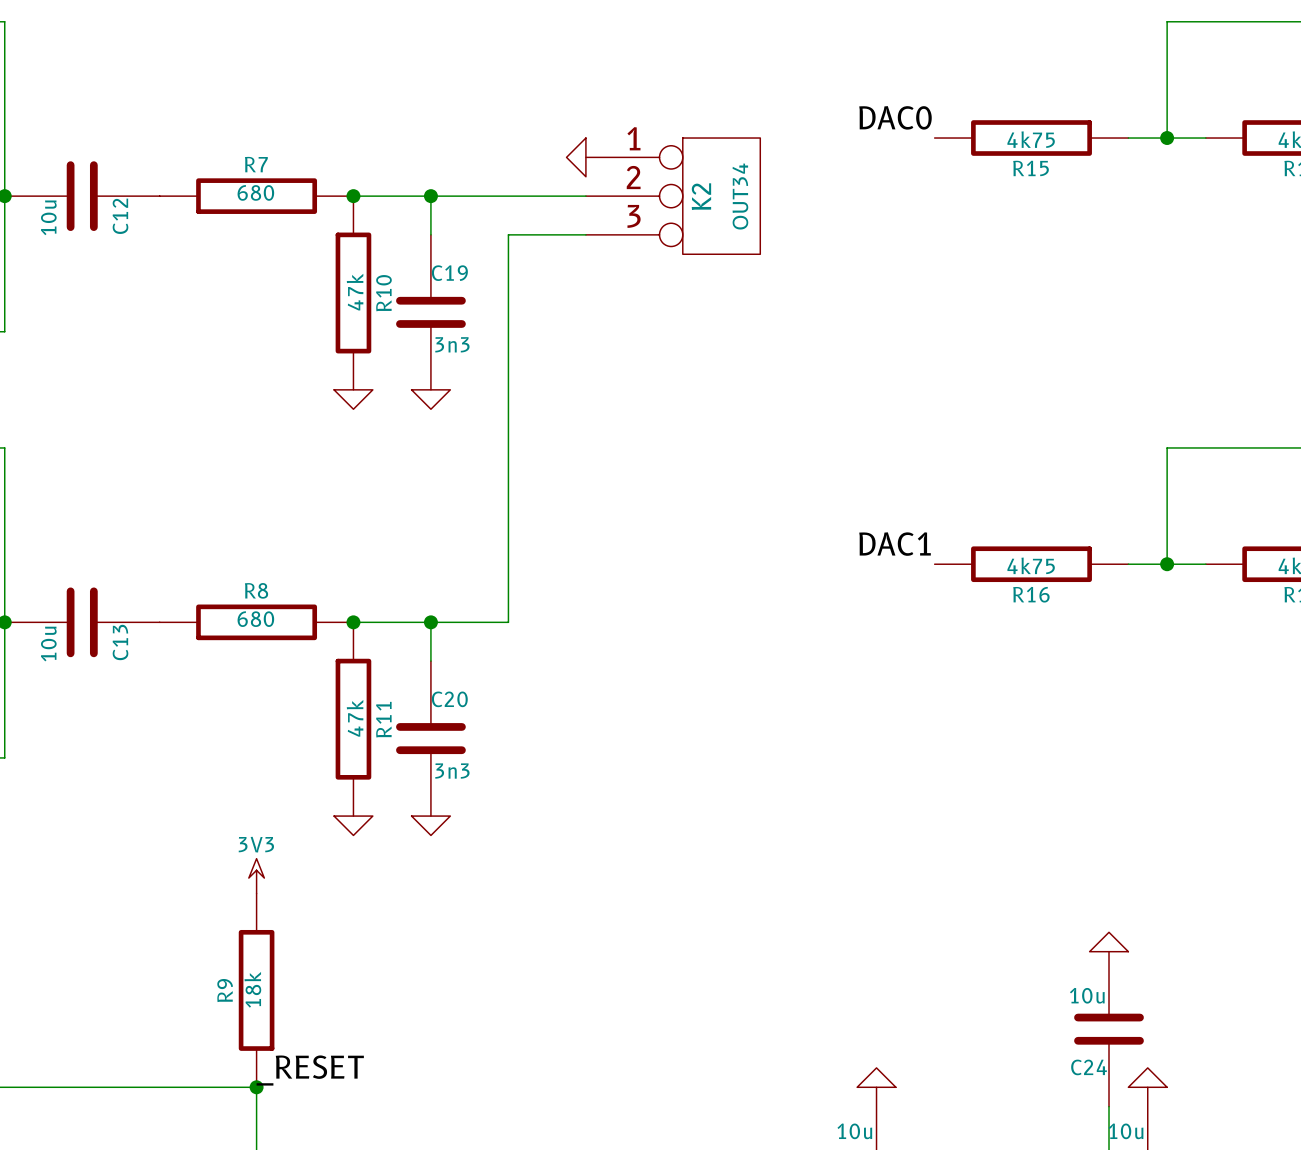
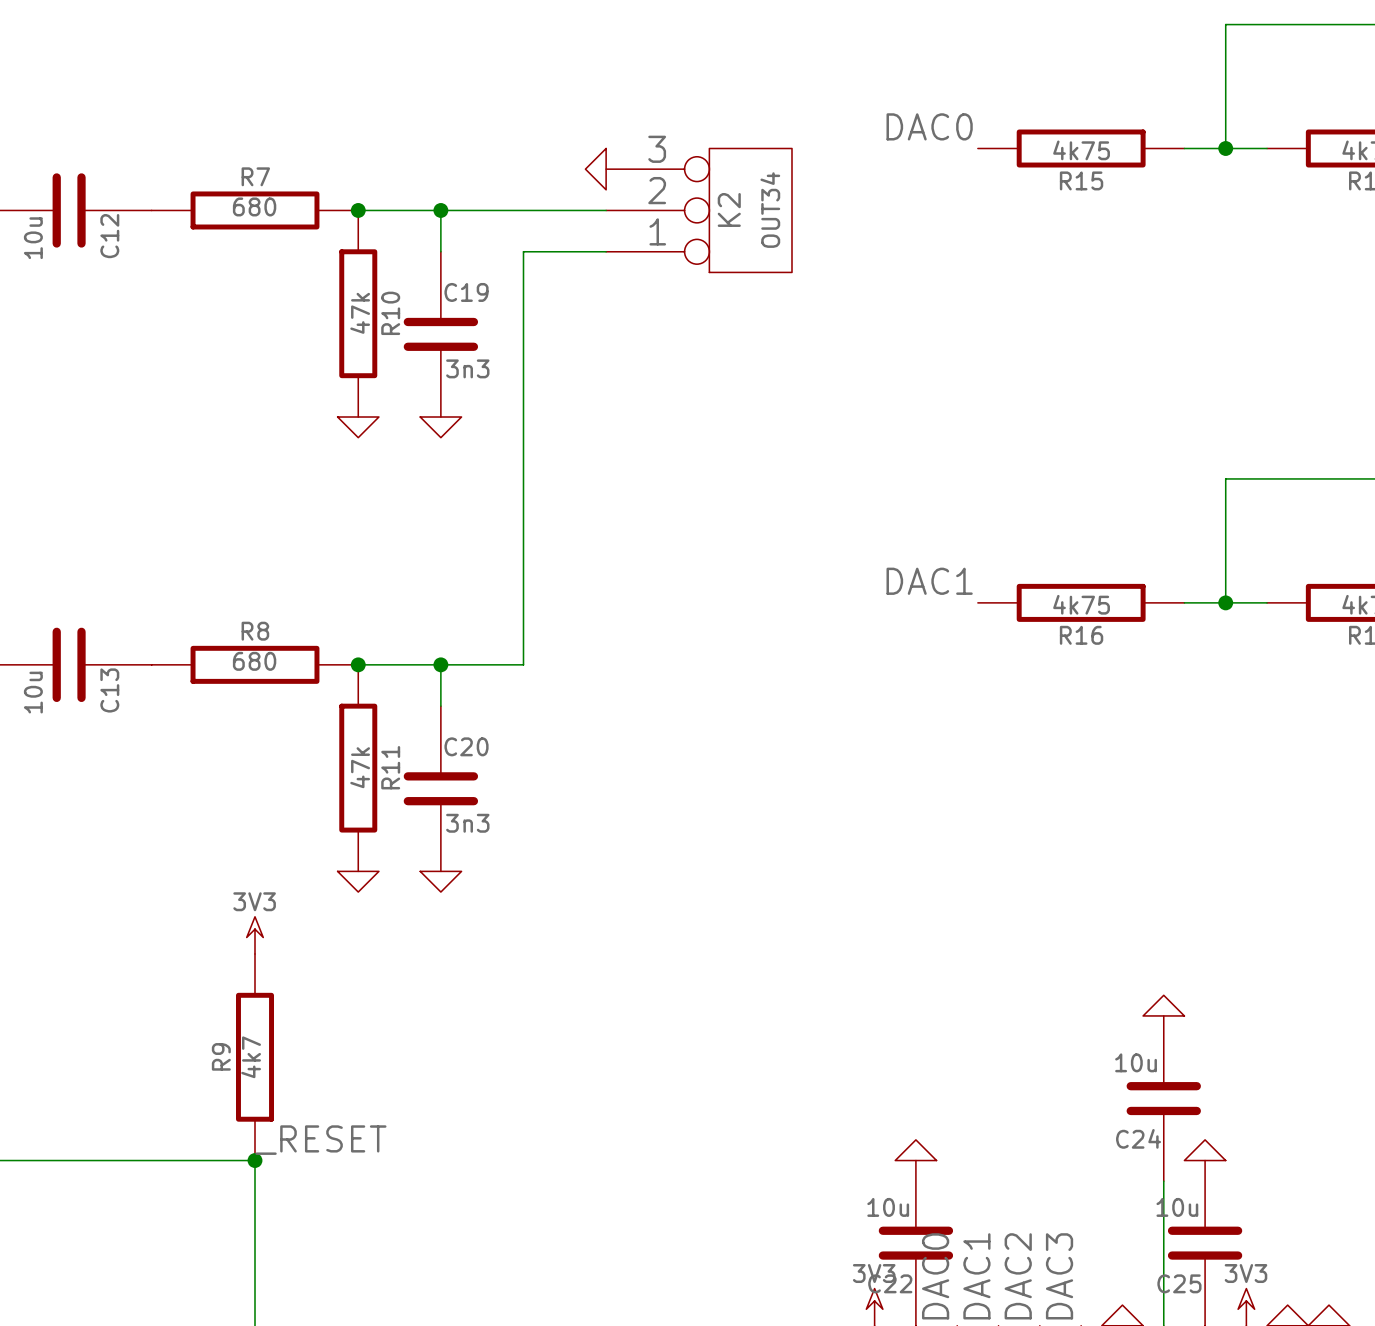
K2 flip: as is (721, 196) -> up-down (750, 210)
R9 value: 18k (252, 989) -> 4k7 (251, 1057)

